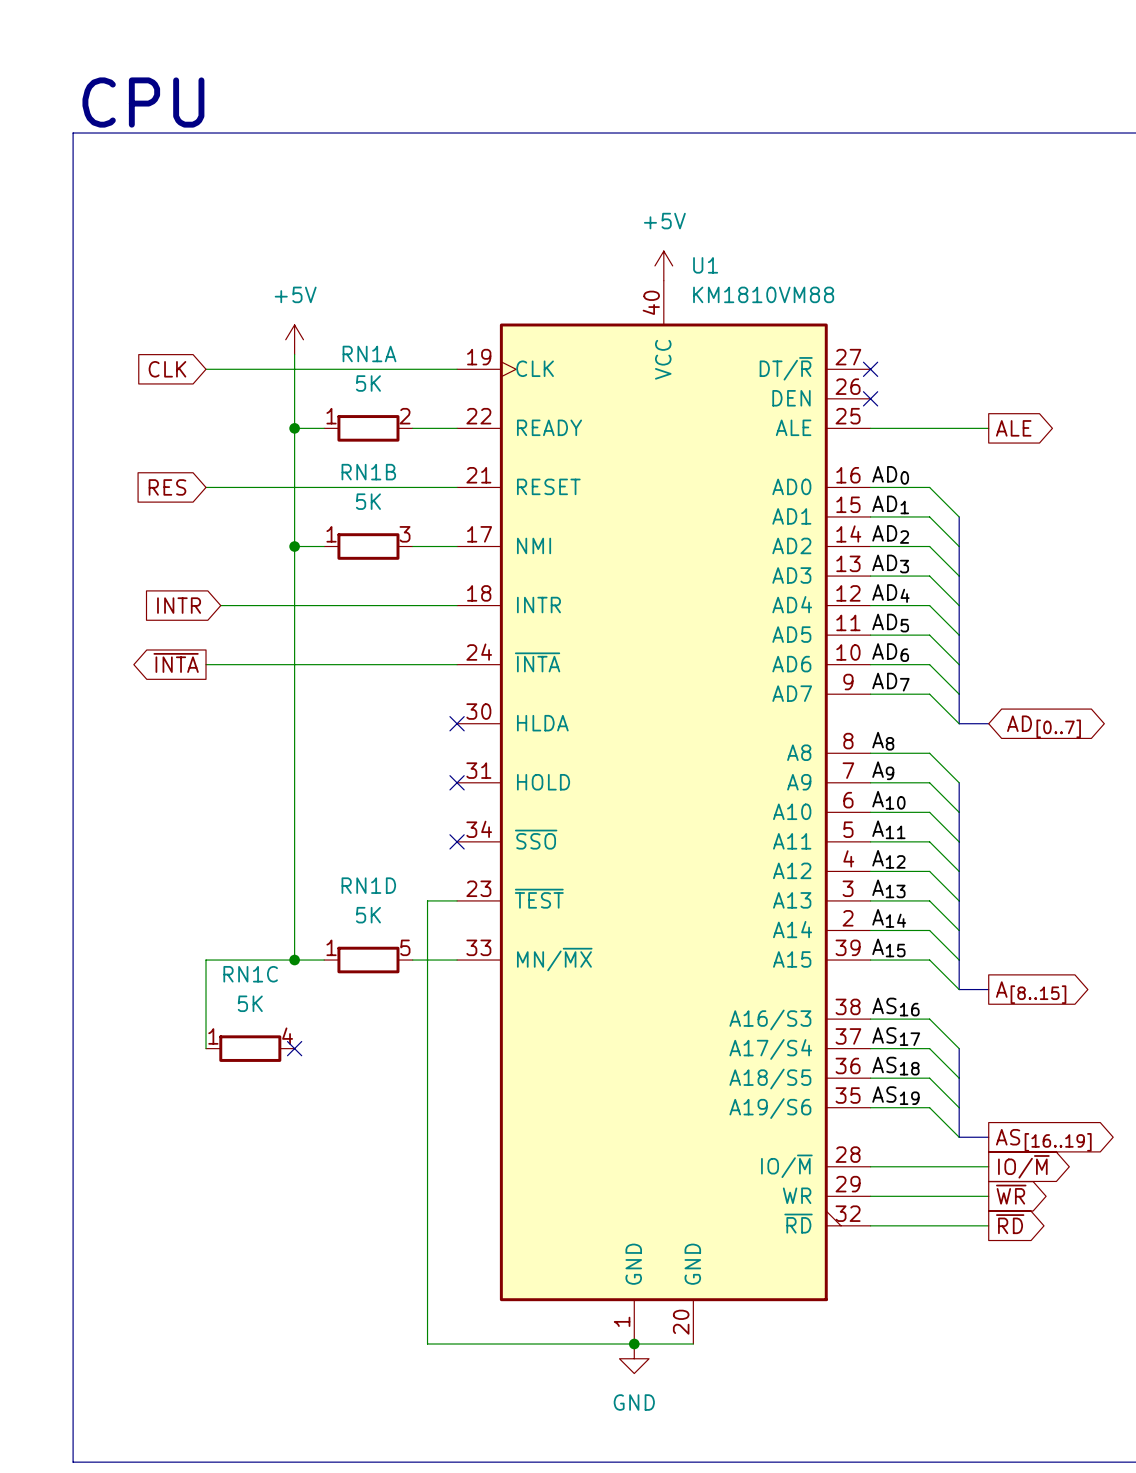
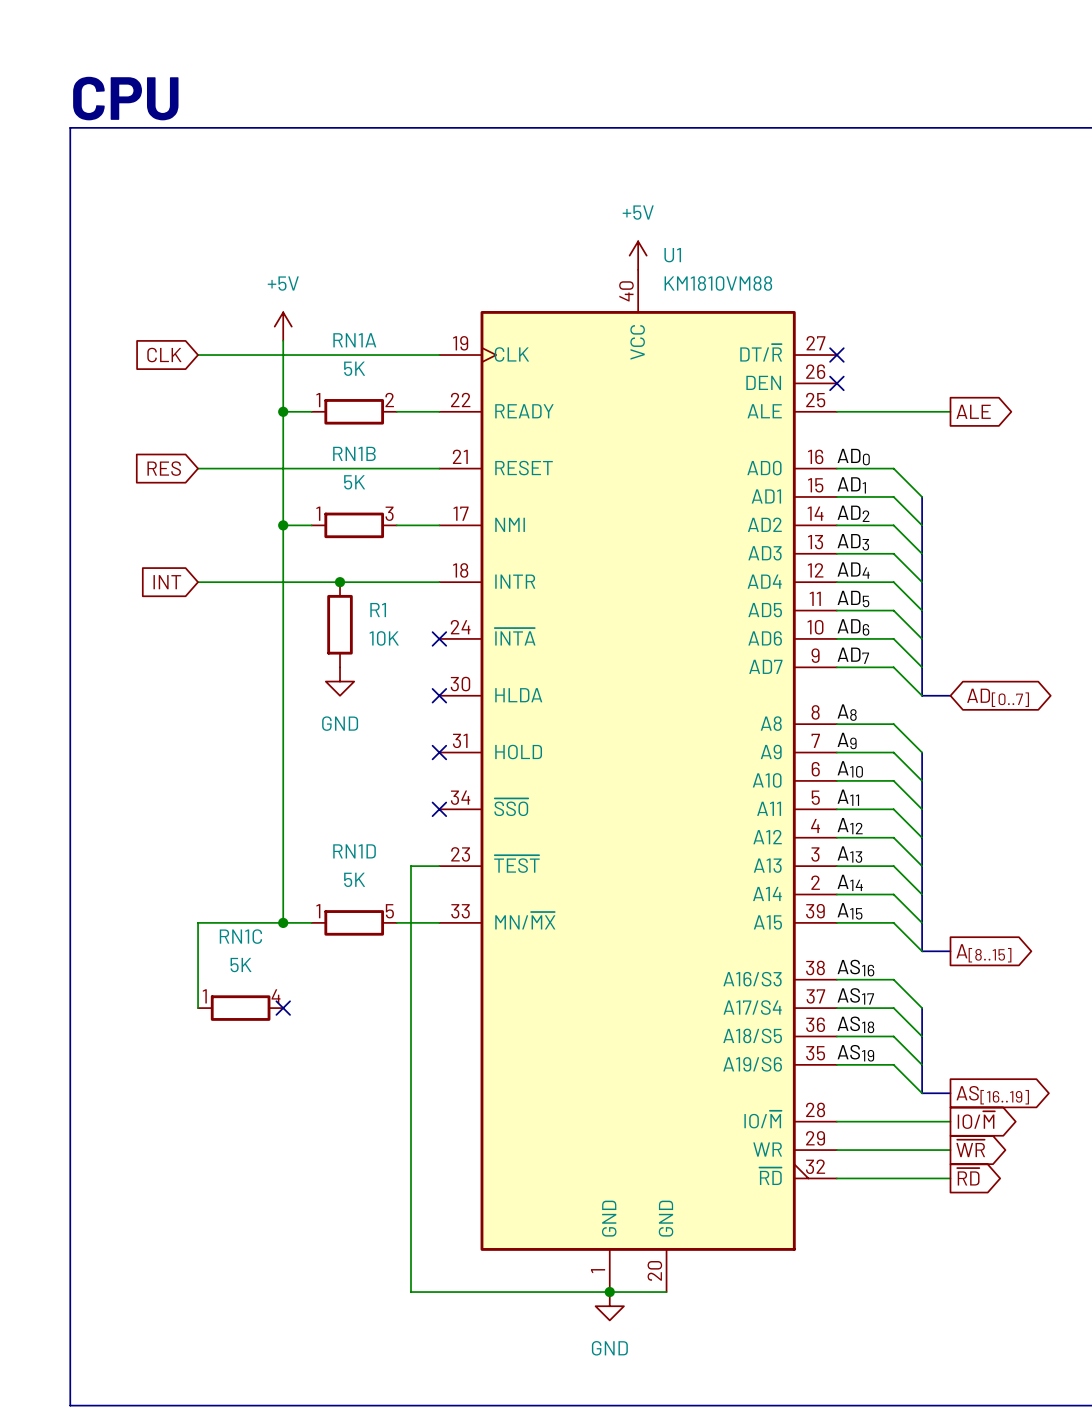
global label: INTR (179, 605) -> INT (167, 582)
wire: none -> (198, 582) (212, 582)
junction: none -> (340, 582)
R1: none -> 10K (340, 624)
global label: ~{INTA} (176, 662) -> none
wire: (206, 664) (457, 664) -> none
no-connect mark: none -> (439, 638)
power symbol: none -> GND (340, 681)

